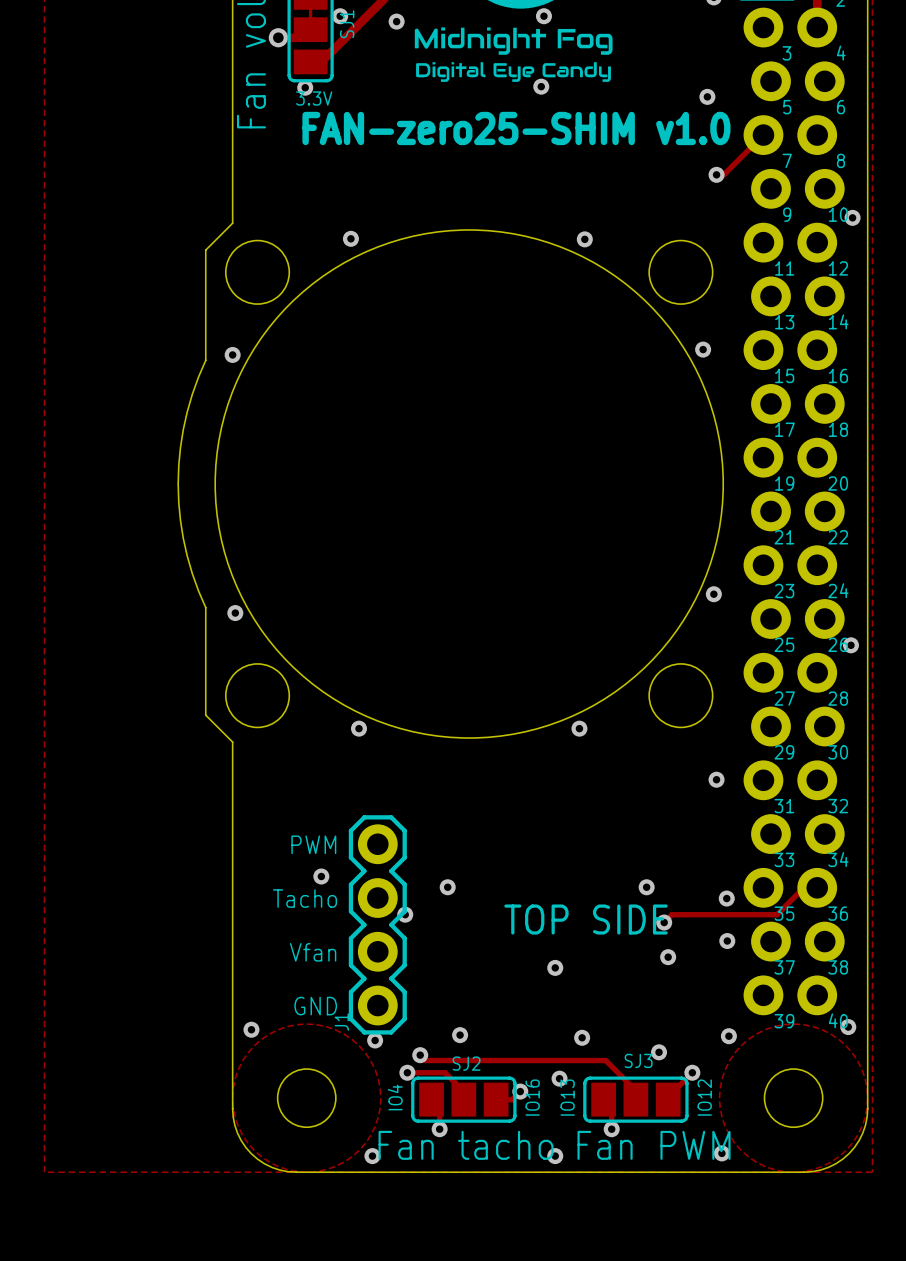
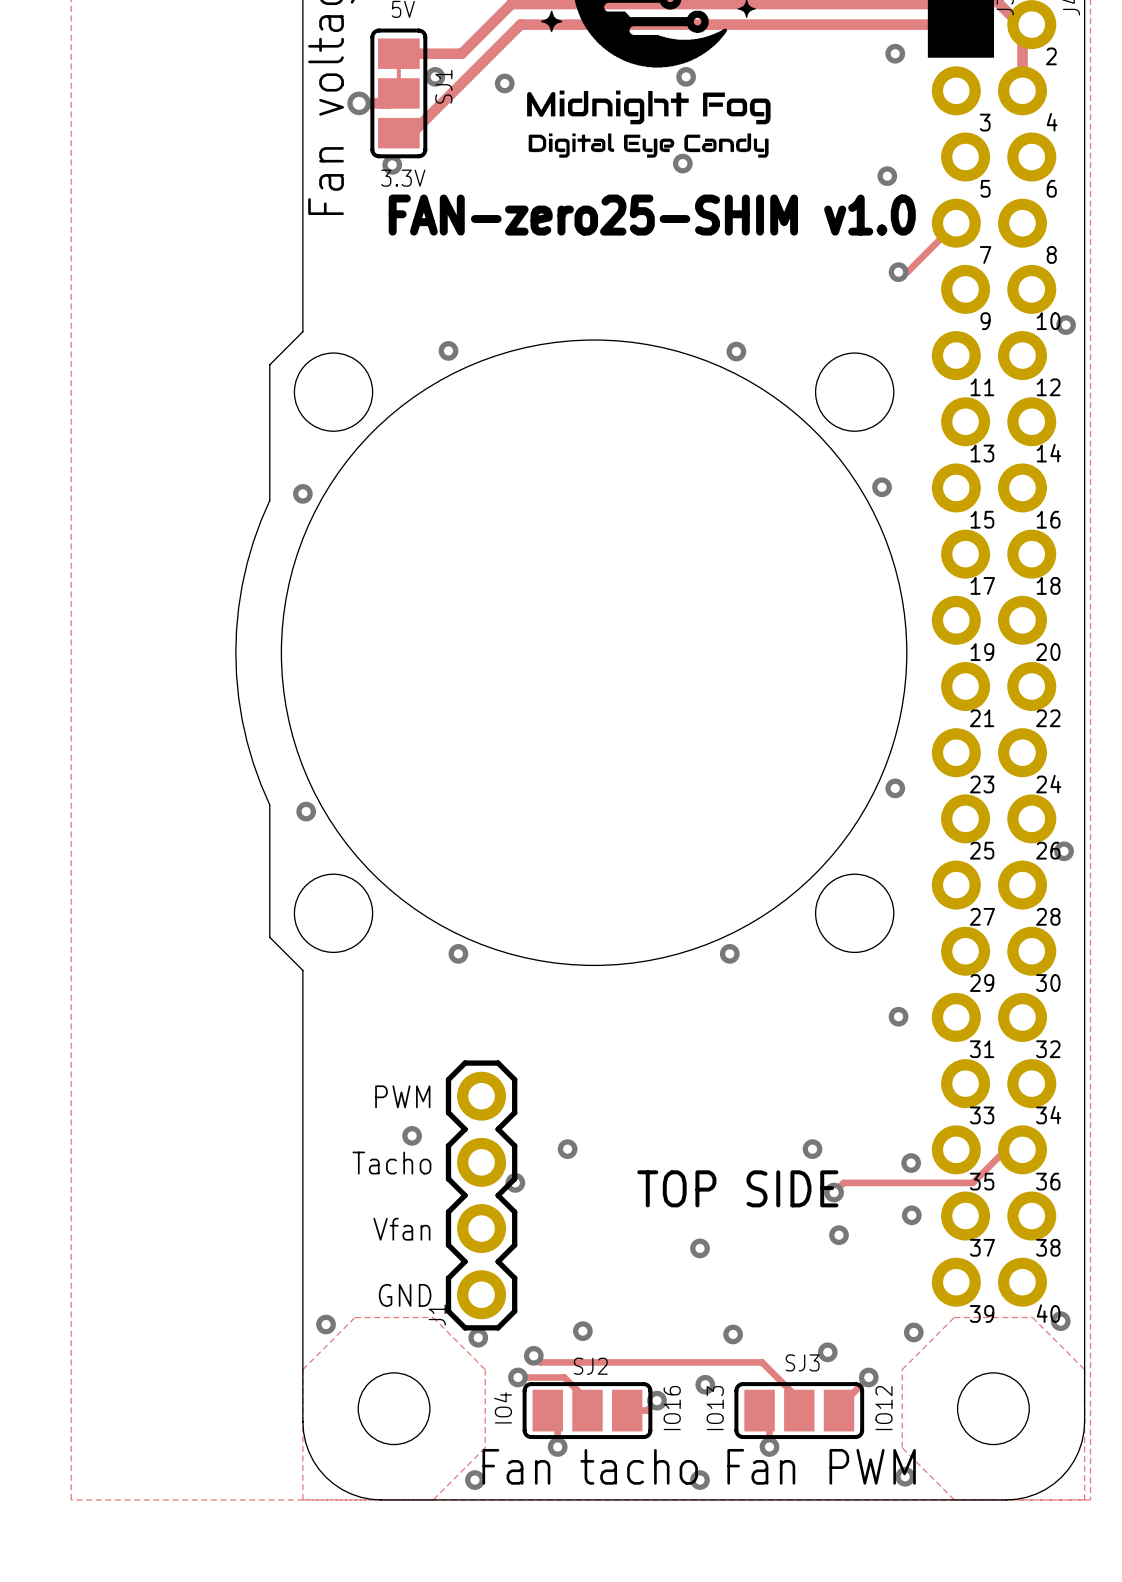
zone outline: (306, 1024) (278, 1029) (254, 1045) (238, 1069) (232, 1098) (238, 1126) (254, 1150) (278, 1166) (306, 1172) (335, 1166) (359, 1150) (375, 1126) (380, 1098) (375, 1069) (359, 1045) (335, 1029) (306, 1024) -> none
zone outline: (793, 1024) (765, 1029) (741, 1045) (725, 1069) (719, 1098) (725, 1126) (741, 1150) (765, 1166) (793, 1172) (821, 1166) (845, 1150) (862, 1126) (867, 1098) (862, 1069) (845, 1045) (821, 1029) (793, 1024) -> none
zone outline: none -> (302, 1499) (302, 1369) (354, 1317) (433, 1317) (485, 1369) (485, 1447) (433, 1499)
zone outline: none -> (954, 1499) (902, 1447) (902, 1369) (954, 1317) (1032, 1317) (1084, 1369) (1084, 1499)

